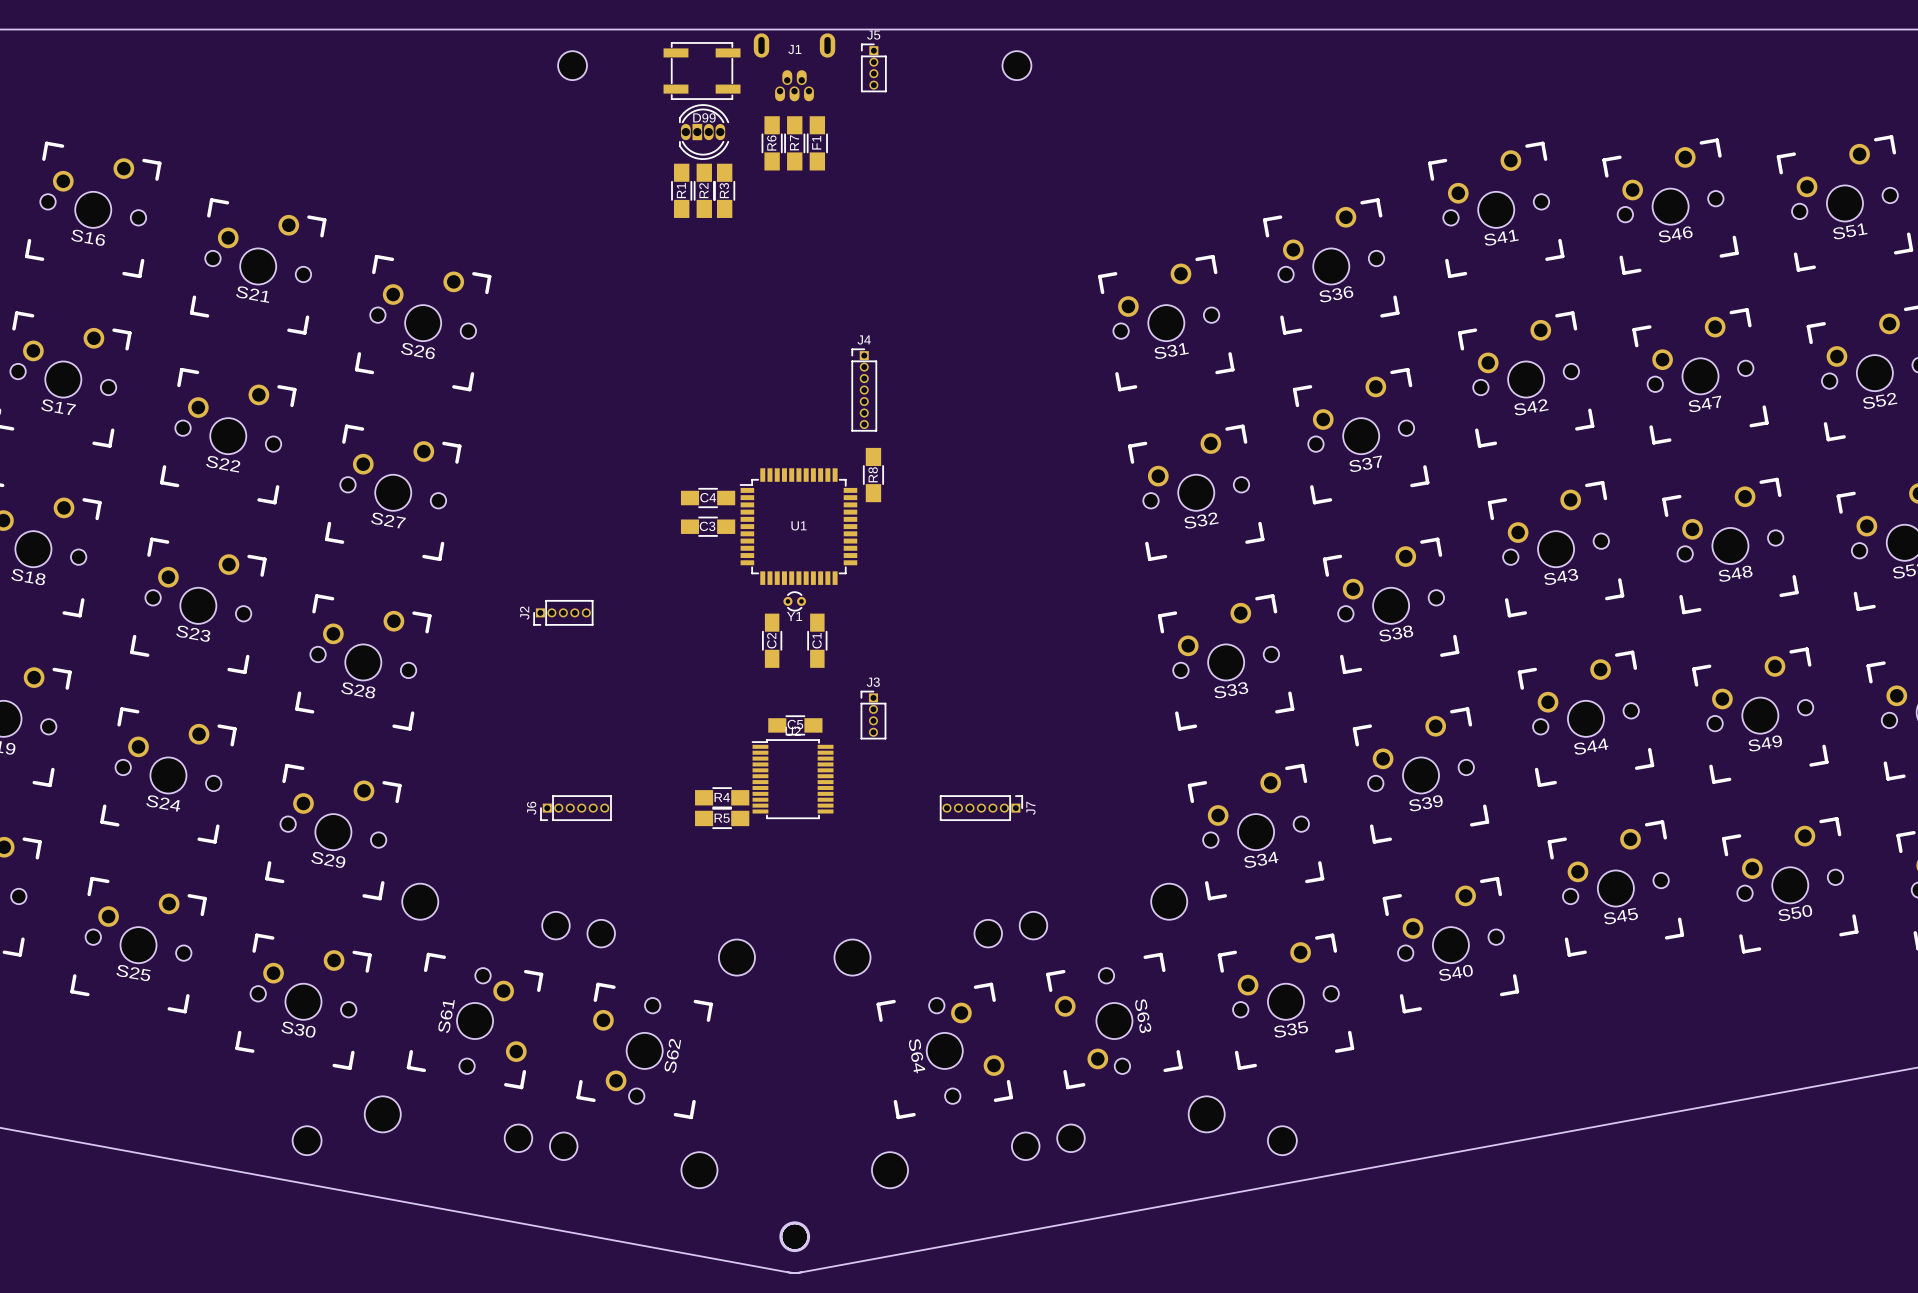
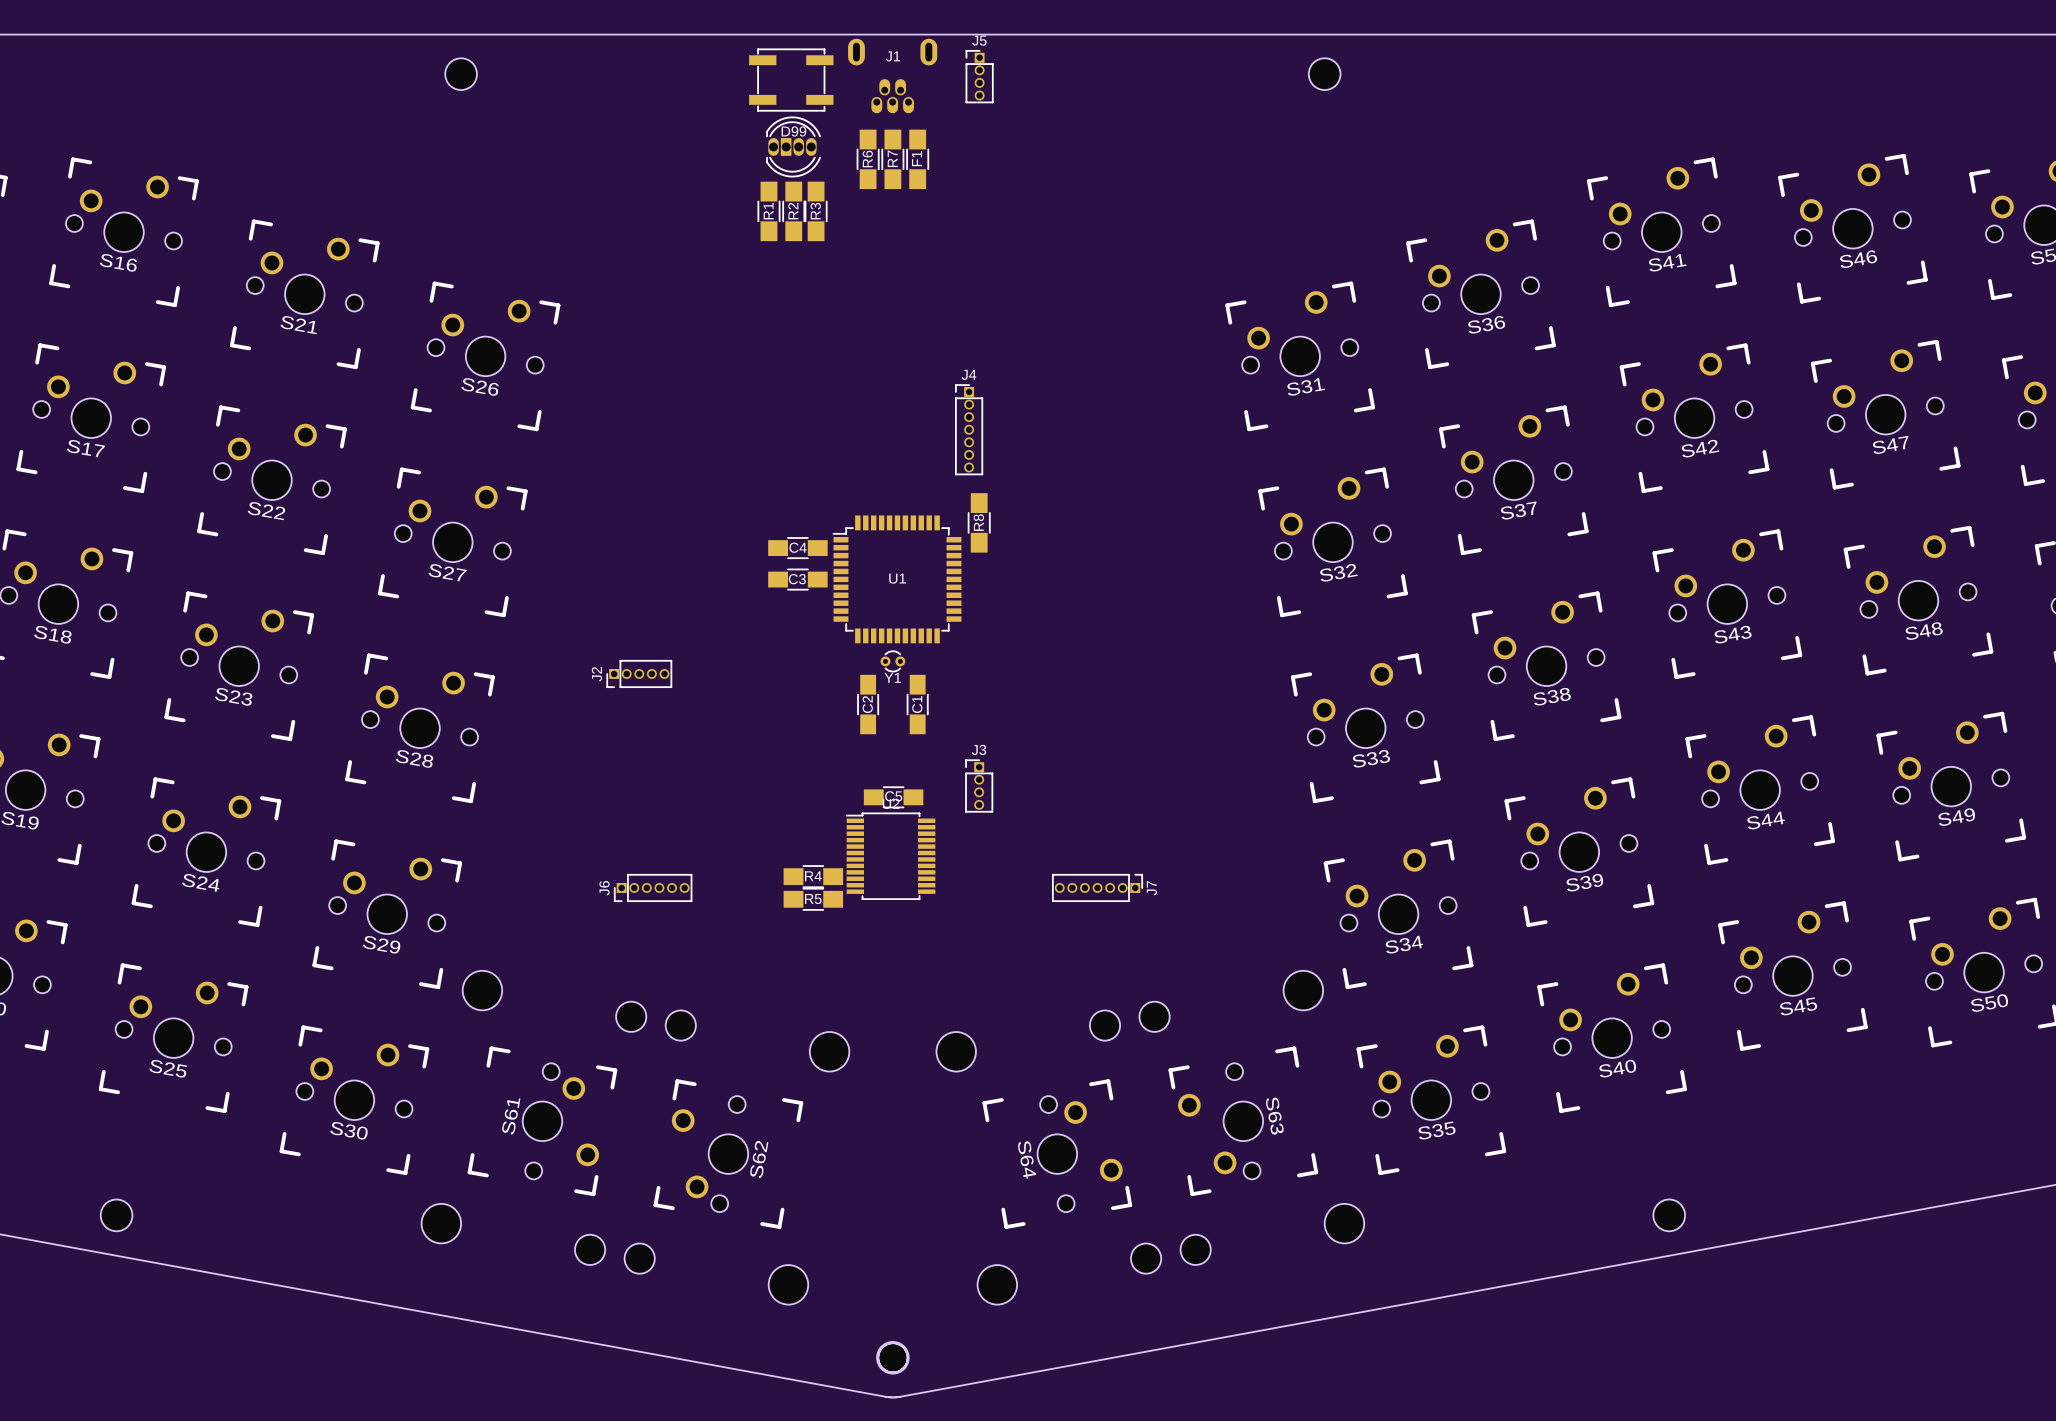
part position: (572, 65) -> (461, 74)
part position: (1016, 65) -> (1324, 74)
part position: (307, 1140) -> (116, 1215)
part position: (1282, 1140) -> (1669, 1215)

